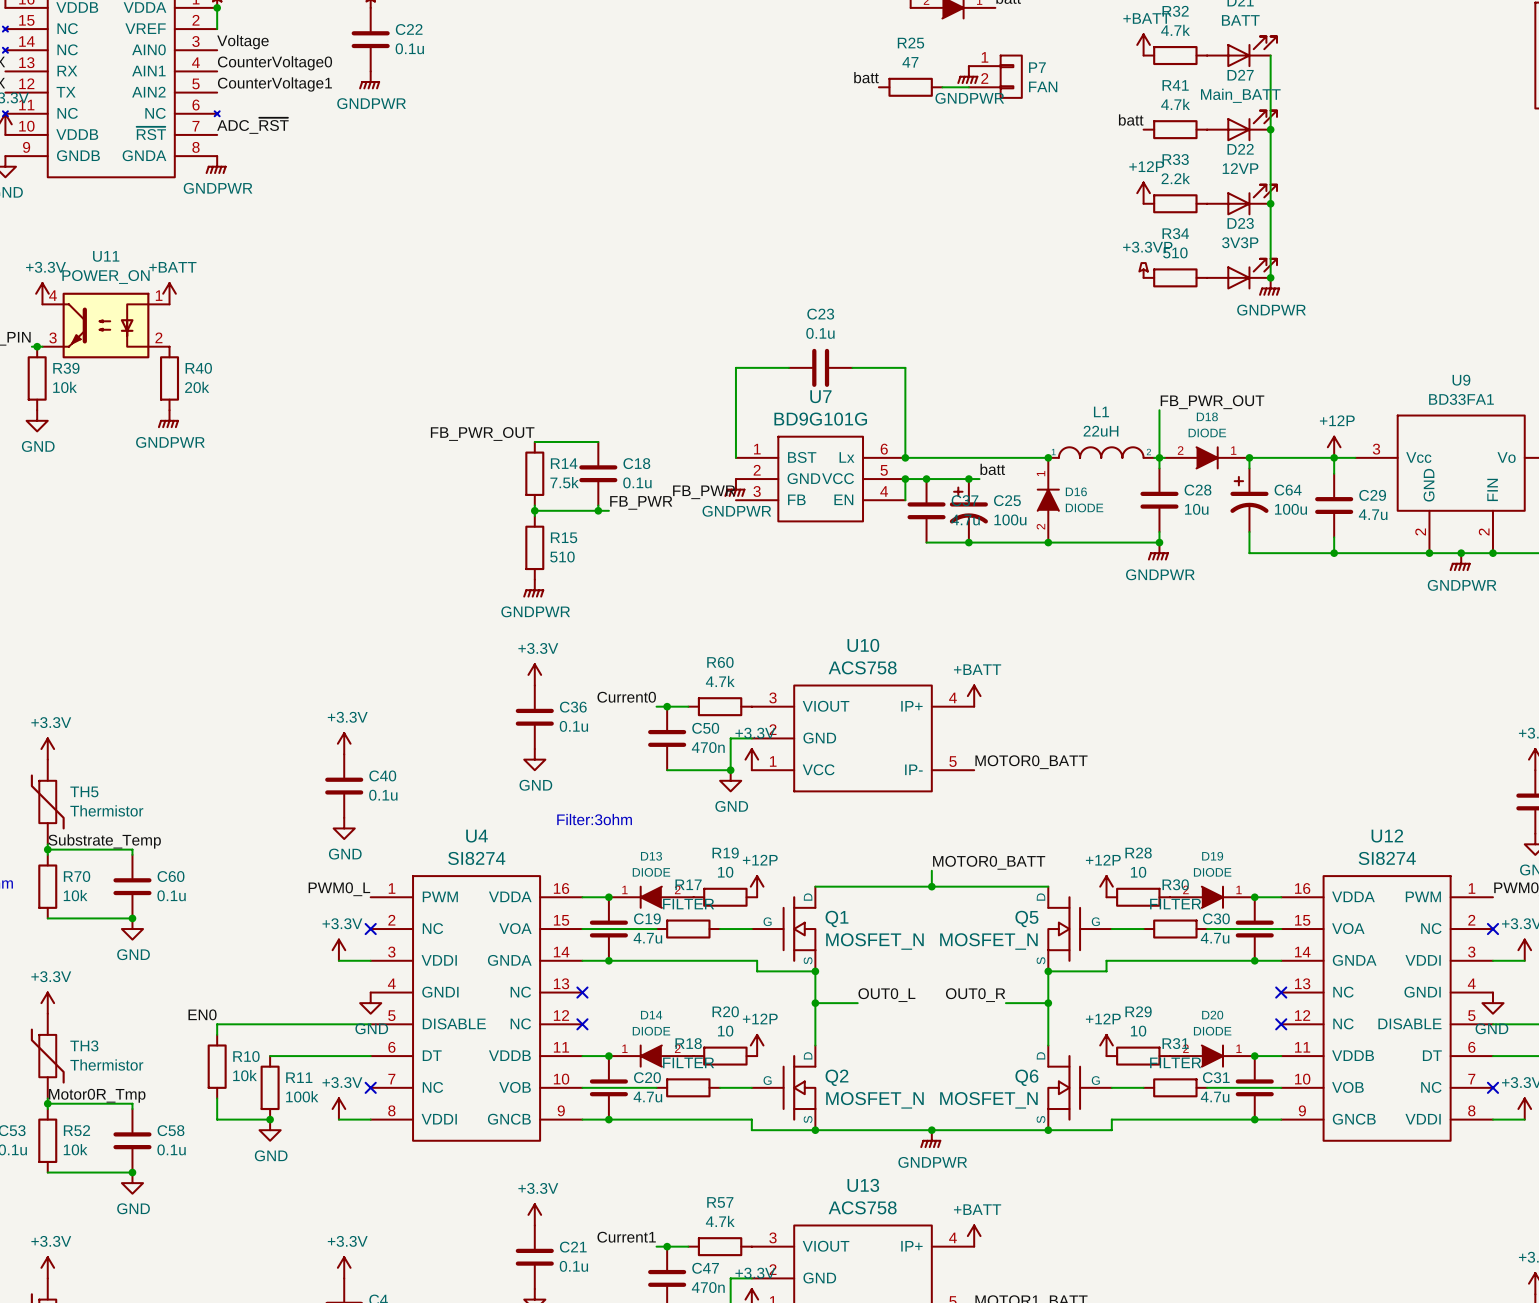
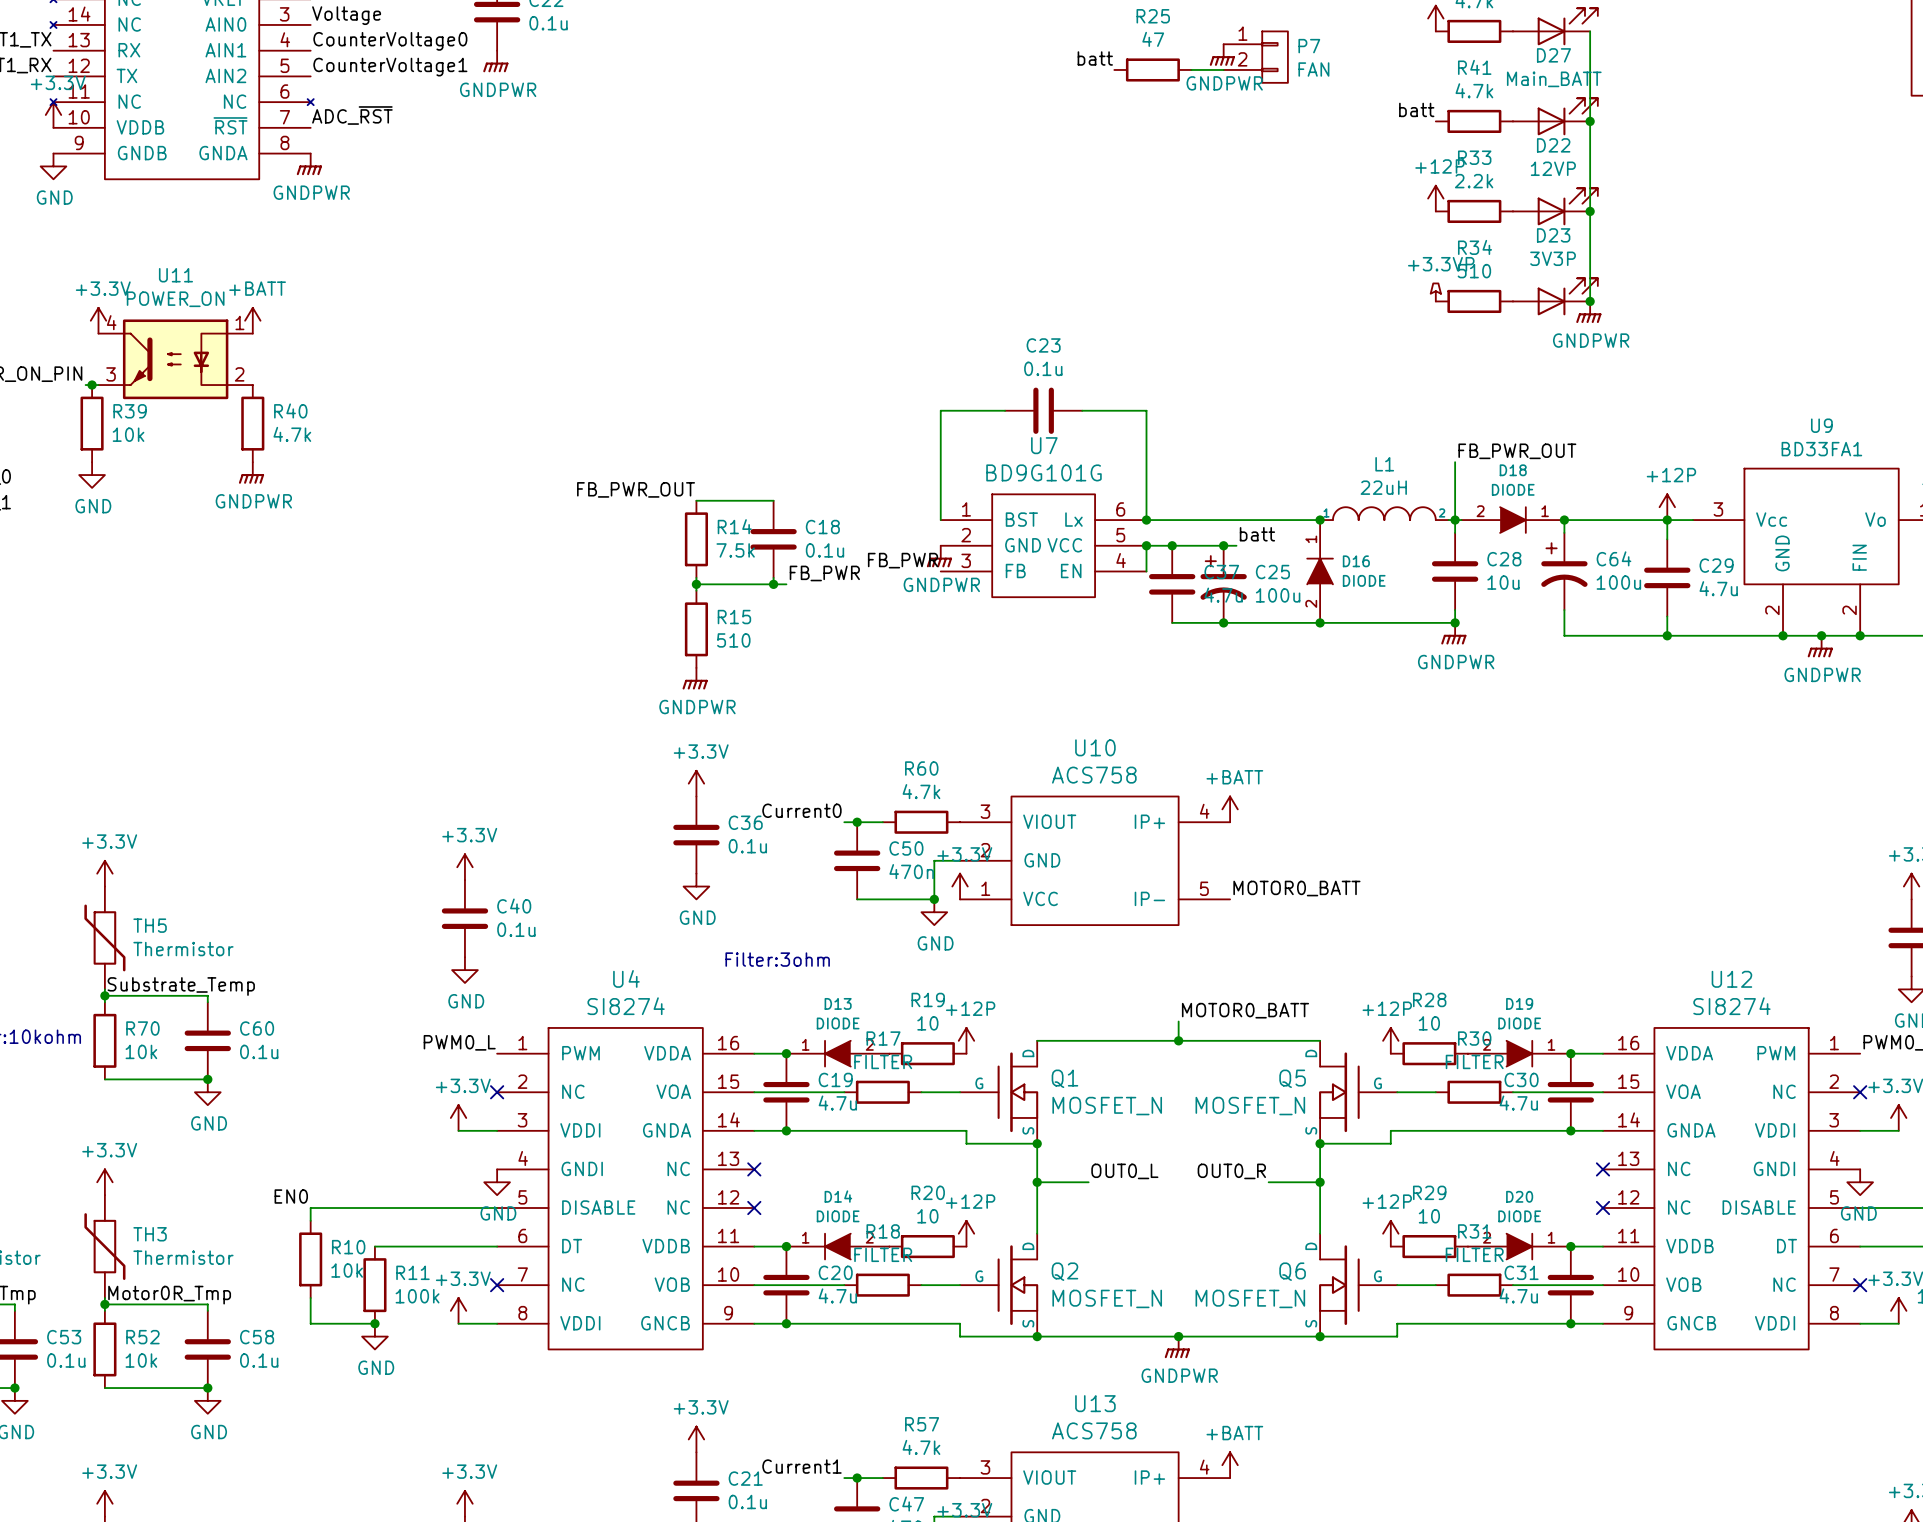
R40 value: 20k (197, 387) -> 4.7k (292, 434)

